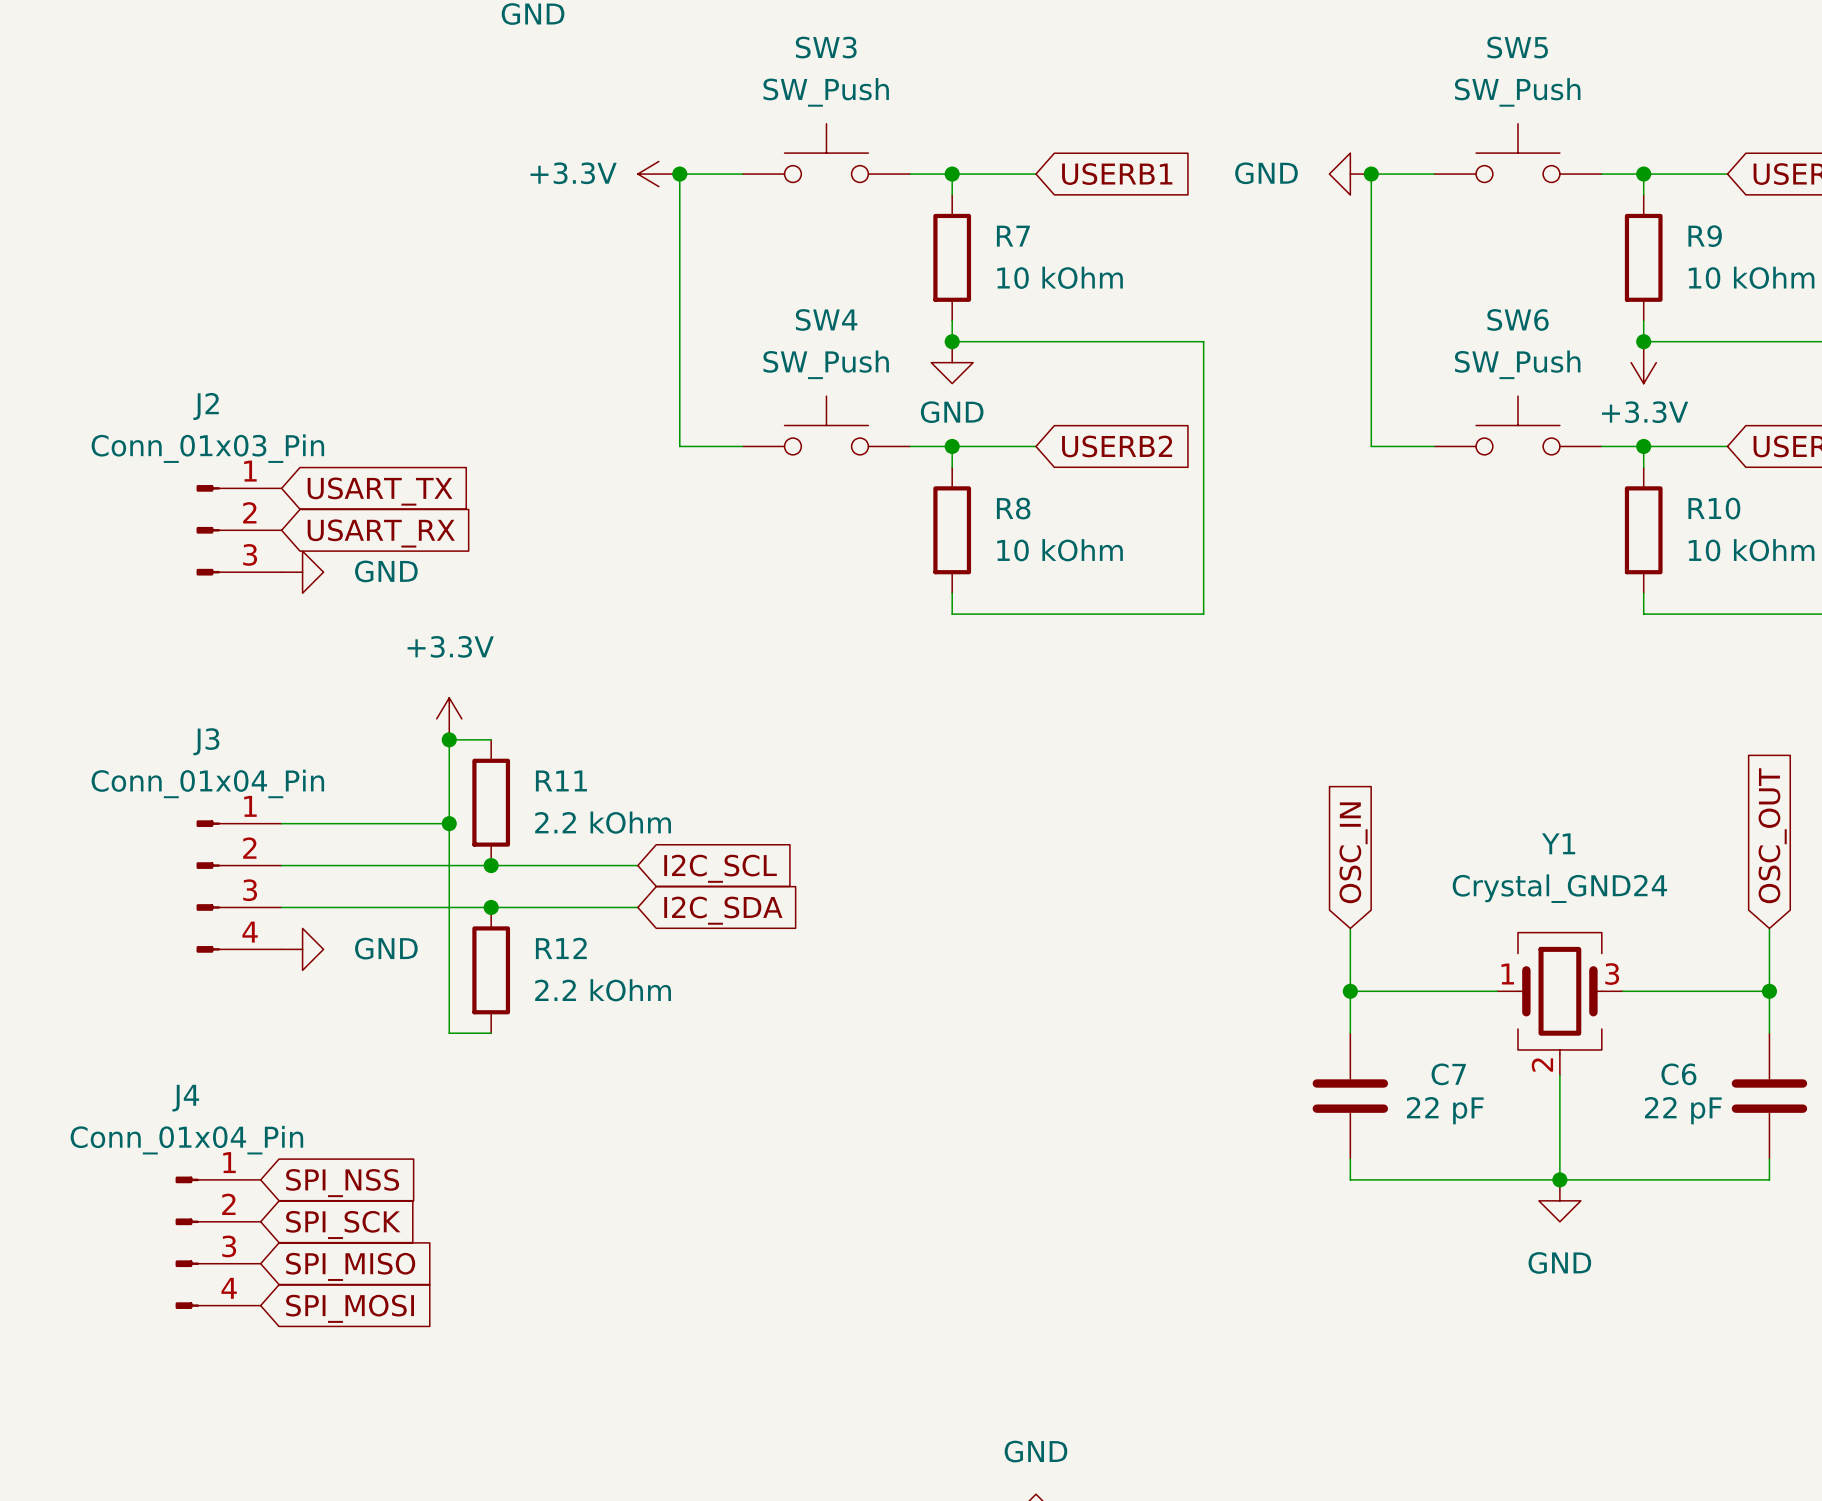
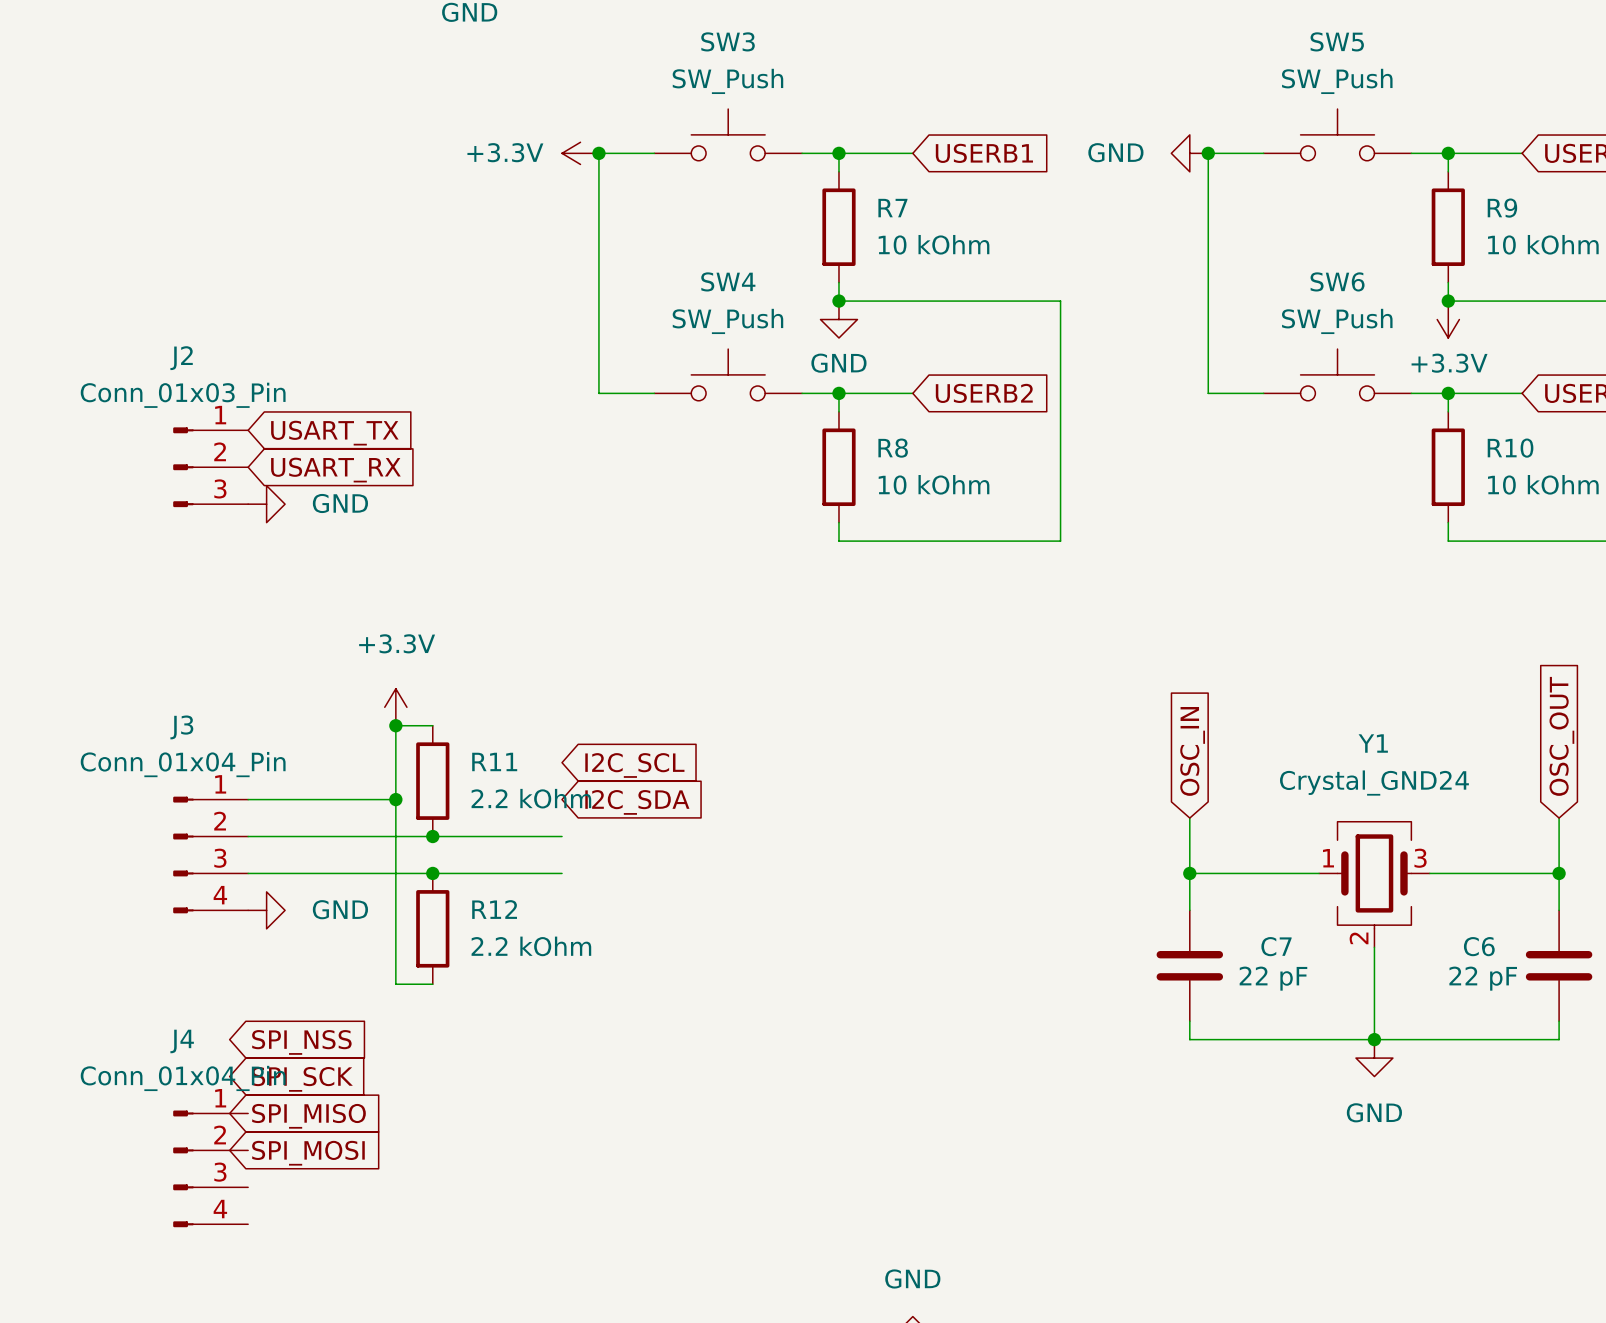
power symbol position: +3.3V (449, 718) -> +3.3V (395, 707)
junction: (449, 739) -> none
wire: (491, 739) (449, 739) (449, 823) (281, 823) -> none
R11 position: (491, 802) -> (432, 781)
wire: none -> (395, 725) (432, 725)
wire: (281, 865) (637, 865) -> (248, 836) (562, 836)
junction: (491, 865) -> none
J3 position: (239, 886) -> (210, 854)
wire: (449, 907) (637, 907) -> none
junction: none -> (395, 799)
junction: (491, 907) -> none
power symbol position: GND (302, 949) -> GND (266, 910)
junction: none -> (432, 836)
R12 position: (491, 970) -> (432, 928)
wire: none -> (248, 873) (562, 873)
junction: none -> (432, 873)
wire: (449, 1033) (491, 1033) -> (395, 910) (395, 984) (432, 984)
J4 position: (218, 1242) -> (210, 1168)

